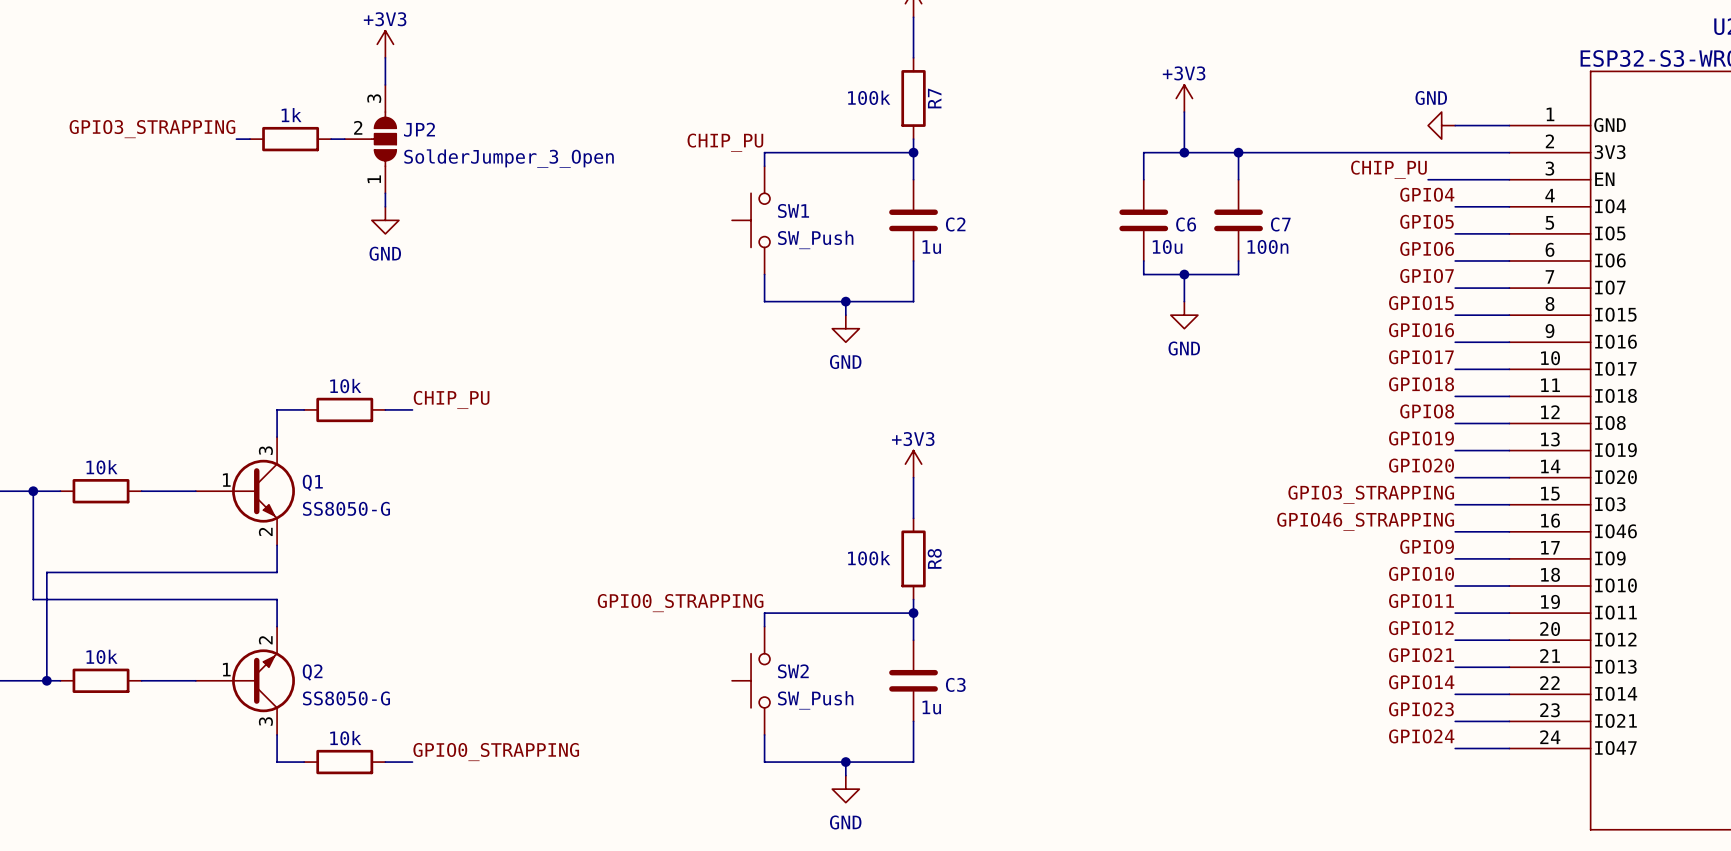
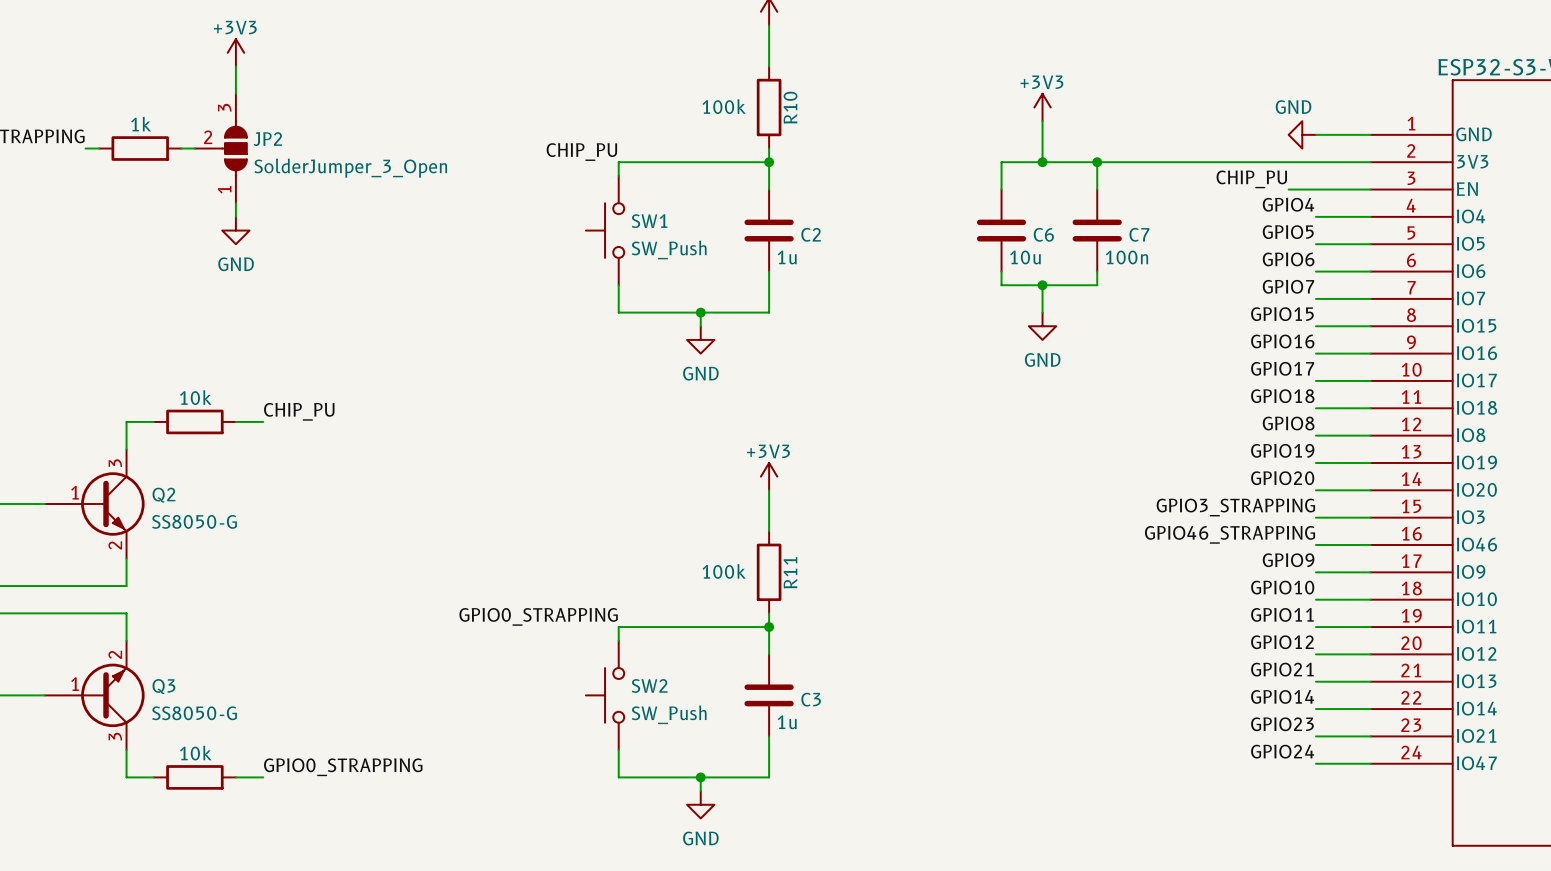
R7 name: R7 (934, 98) -> R10 (790, 107)
Q1 name: Q1 (312, 482) -> Q2 (163, 495)
R8 name: R8 (934, 558) -> R11 (790, 572)
Q2 name: Q2 (312, 672) -> Q3 (163, 686)

